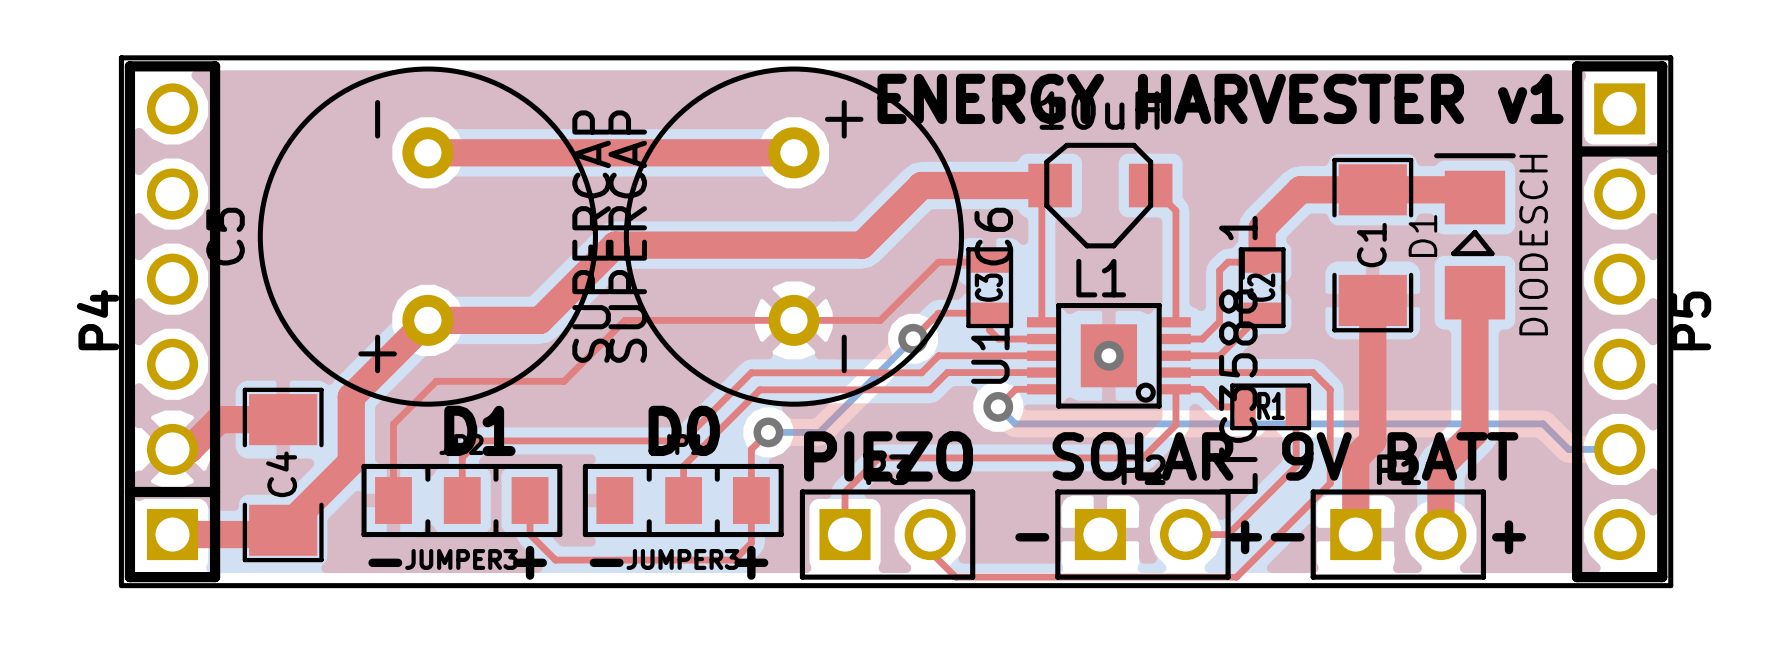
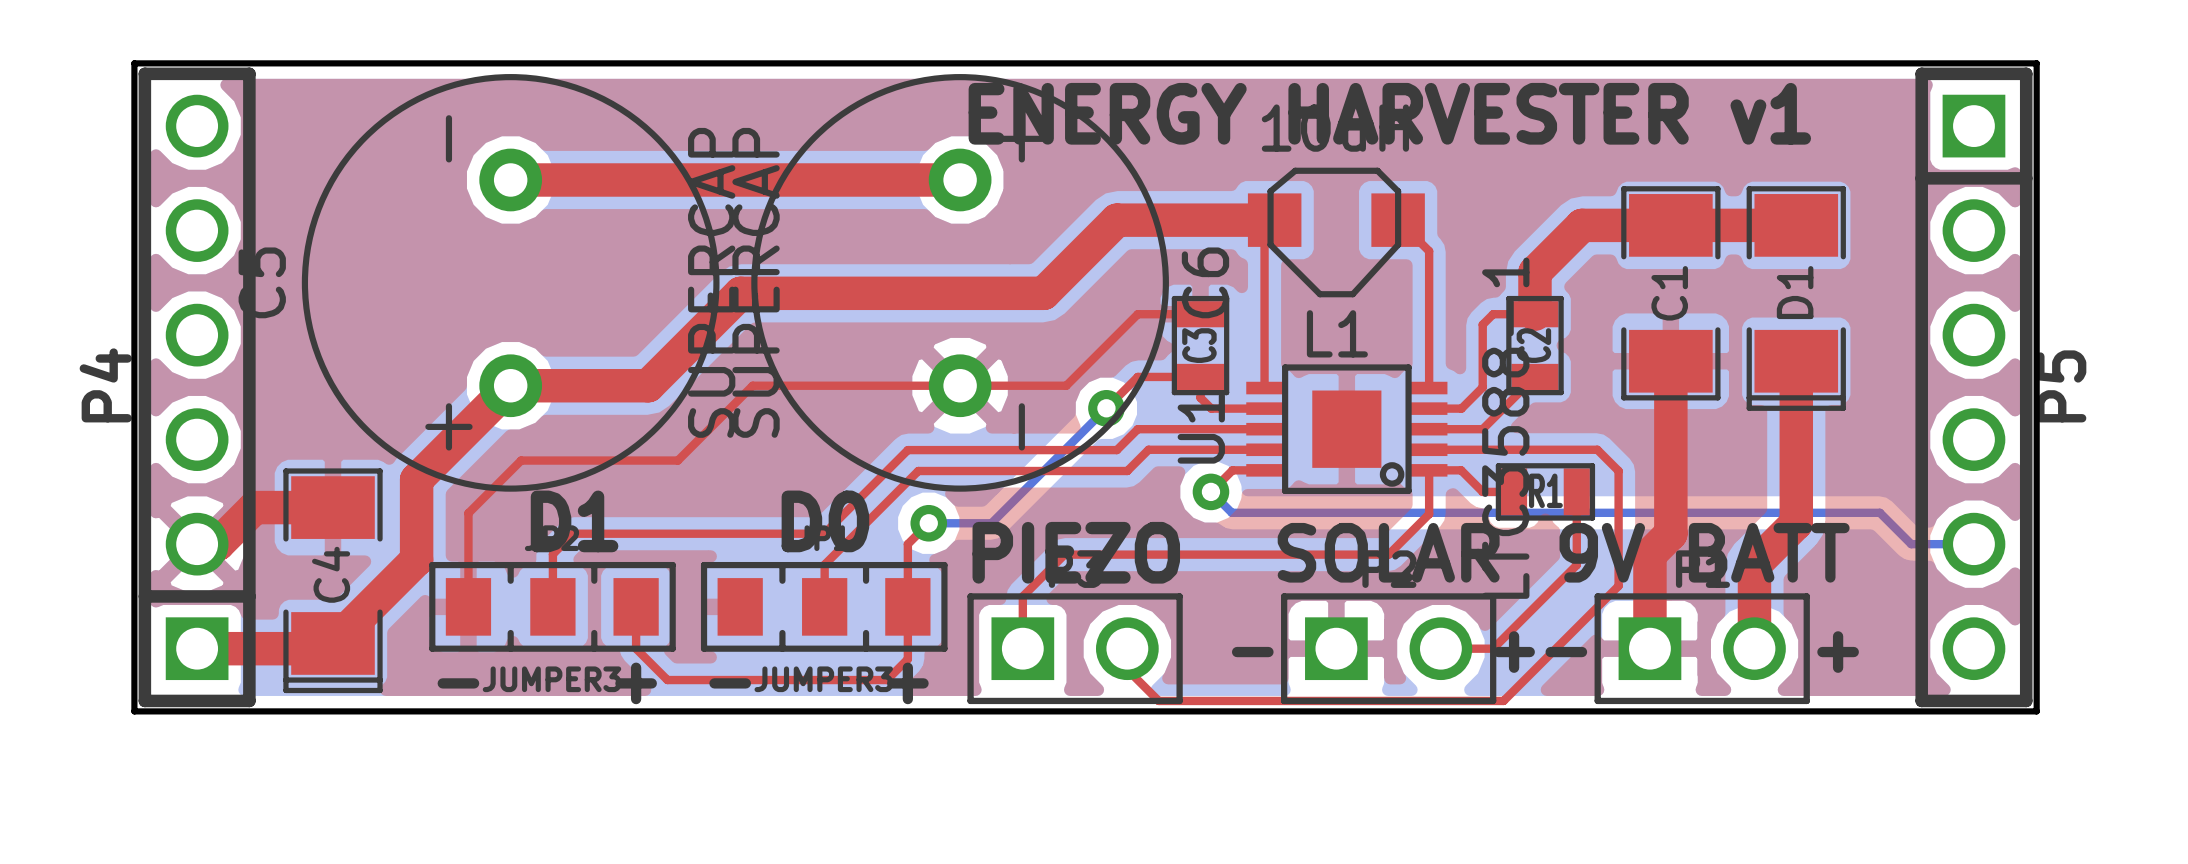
text position: ENERGY HARVESTER v1 (1220, 98) -> ENERGY HARVESTER v1 (1389, 113)
D1 footprint: [1434, 153, 1516, 320] -> [1746, 186, 1846, 411]
D1 value: DIODESCH (1533, 245) -> none
via: (1108, 355) -> none
C4 footprint: [242, 387, 324, 563] -> [283, 468, 383, 694]

